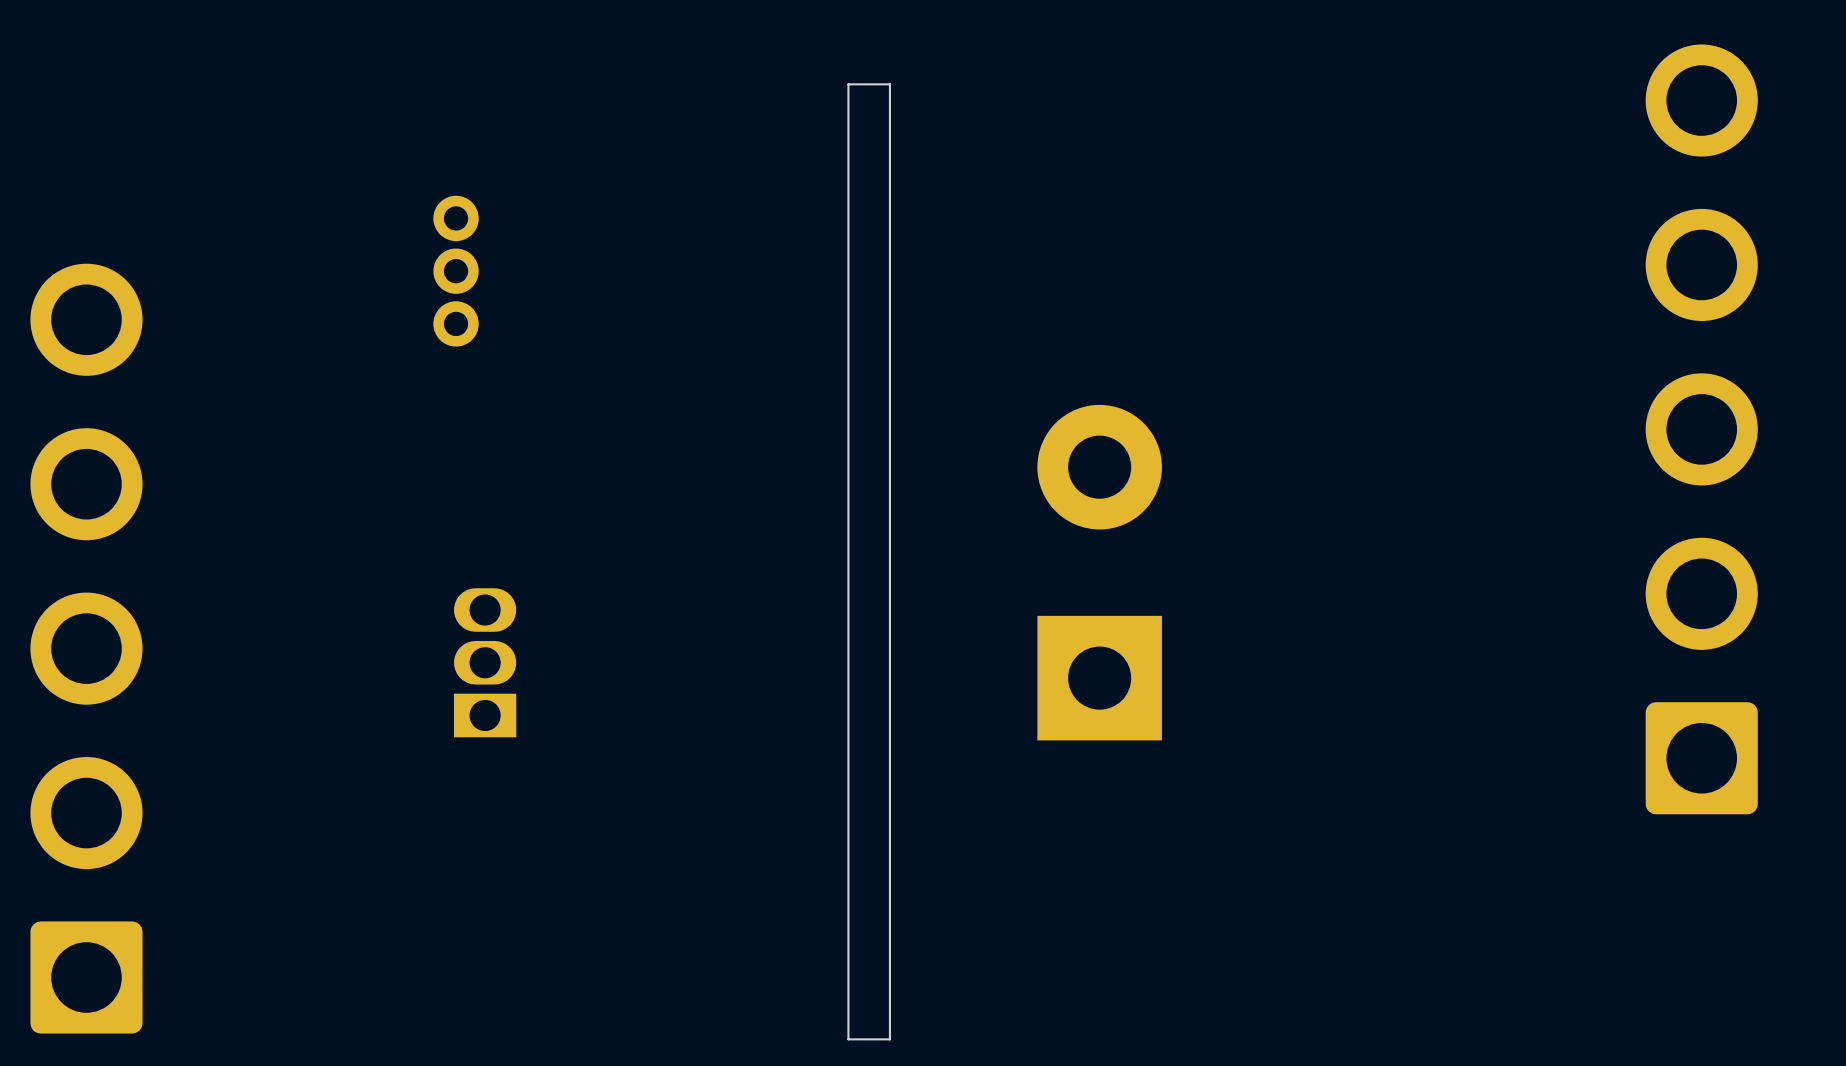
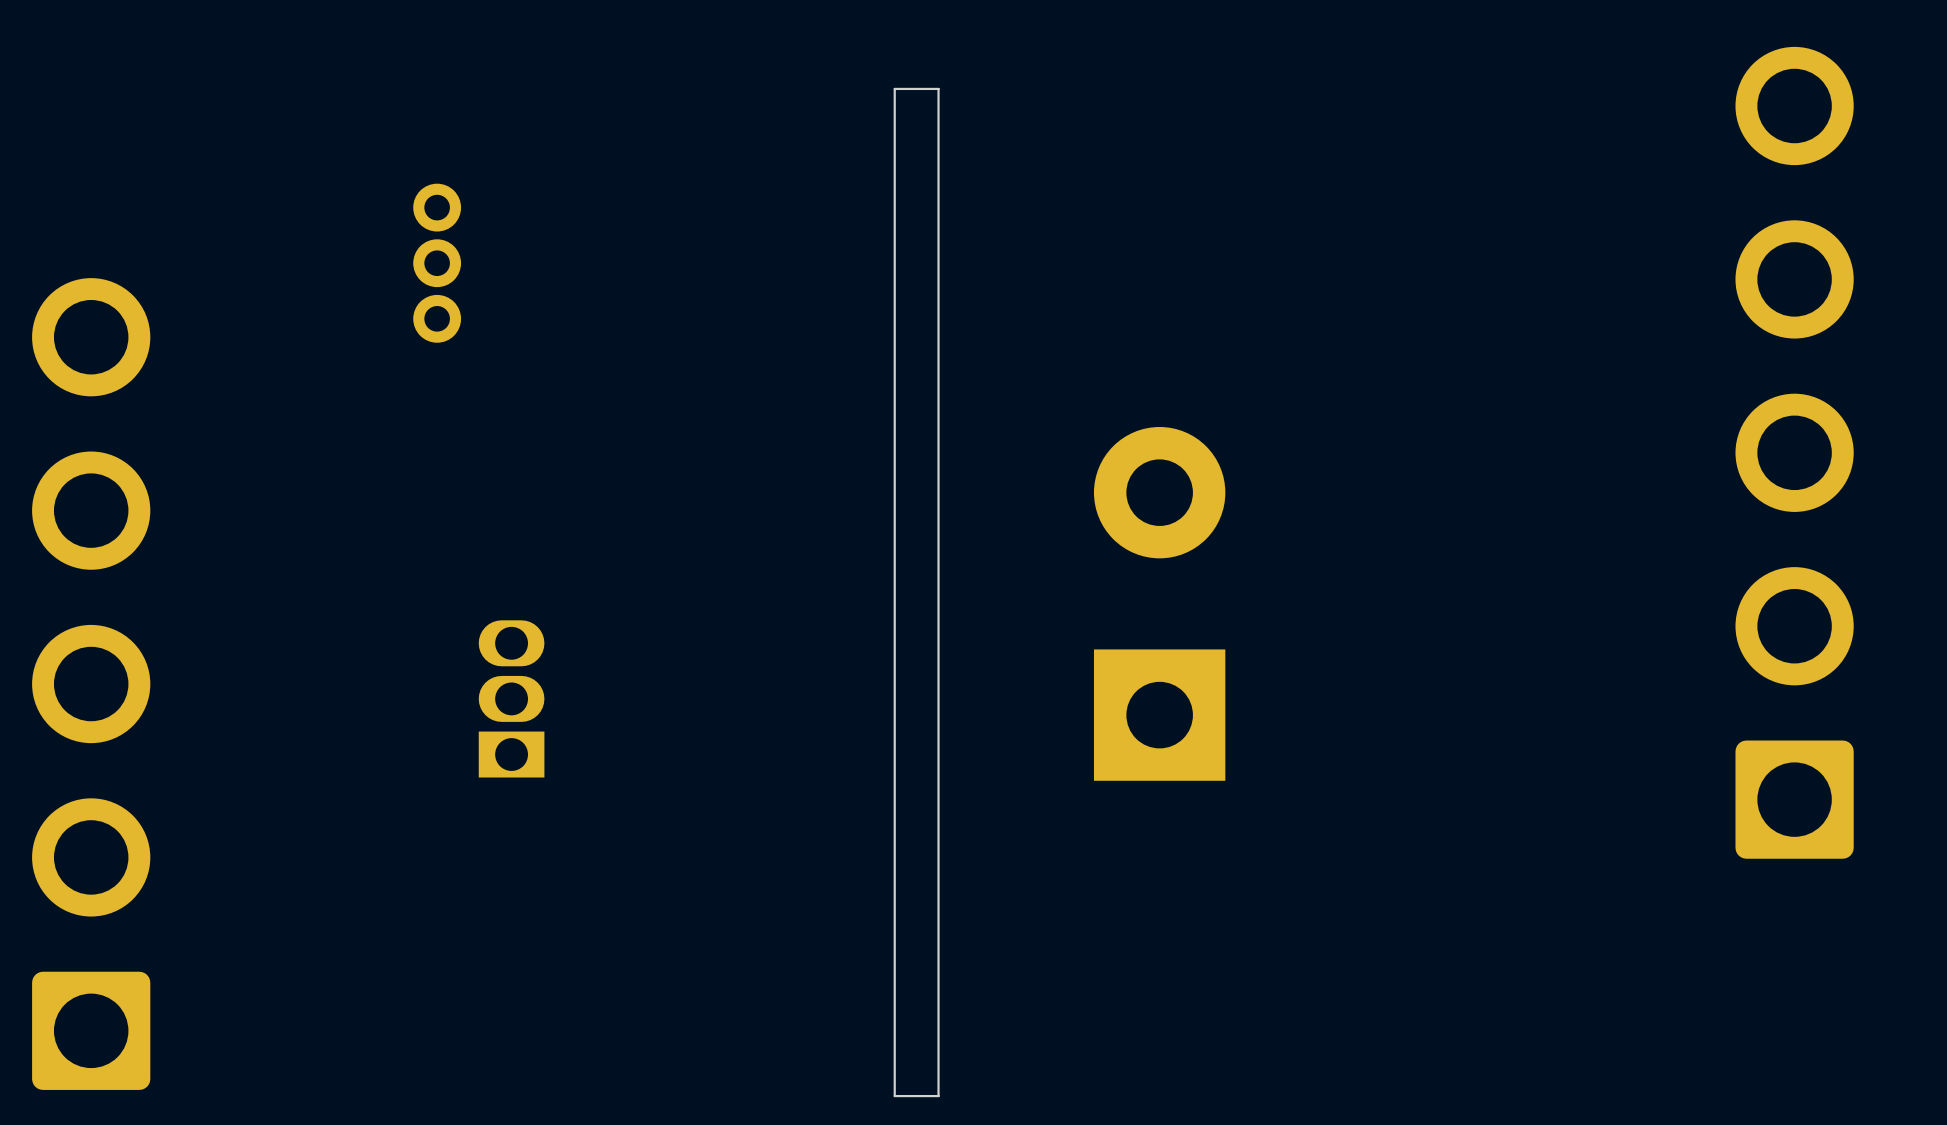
part position: (456, 271) -> (437, 263)

